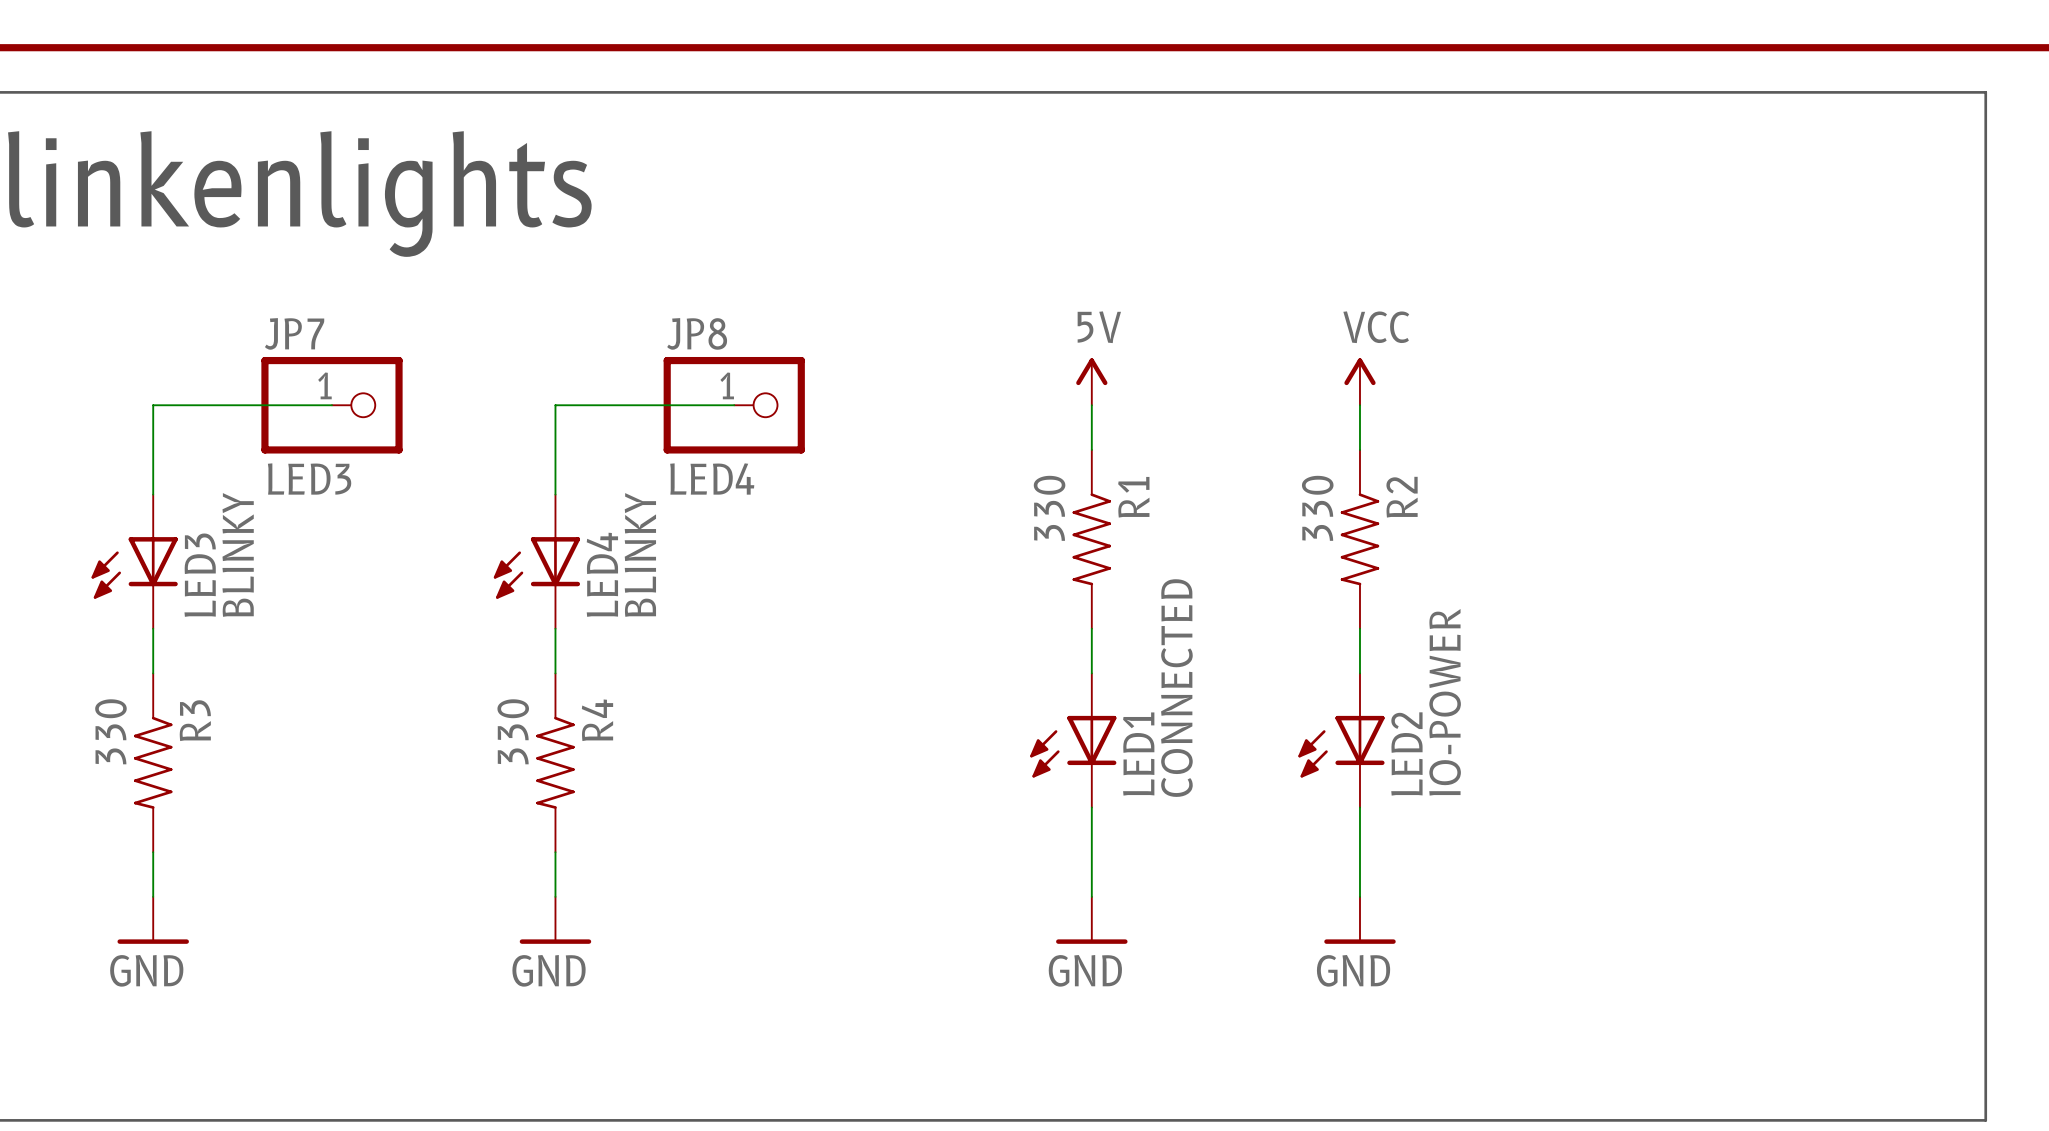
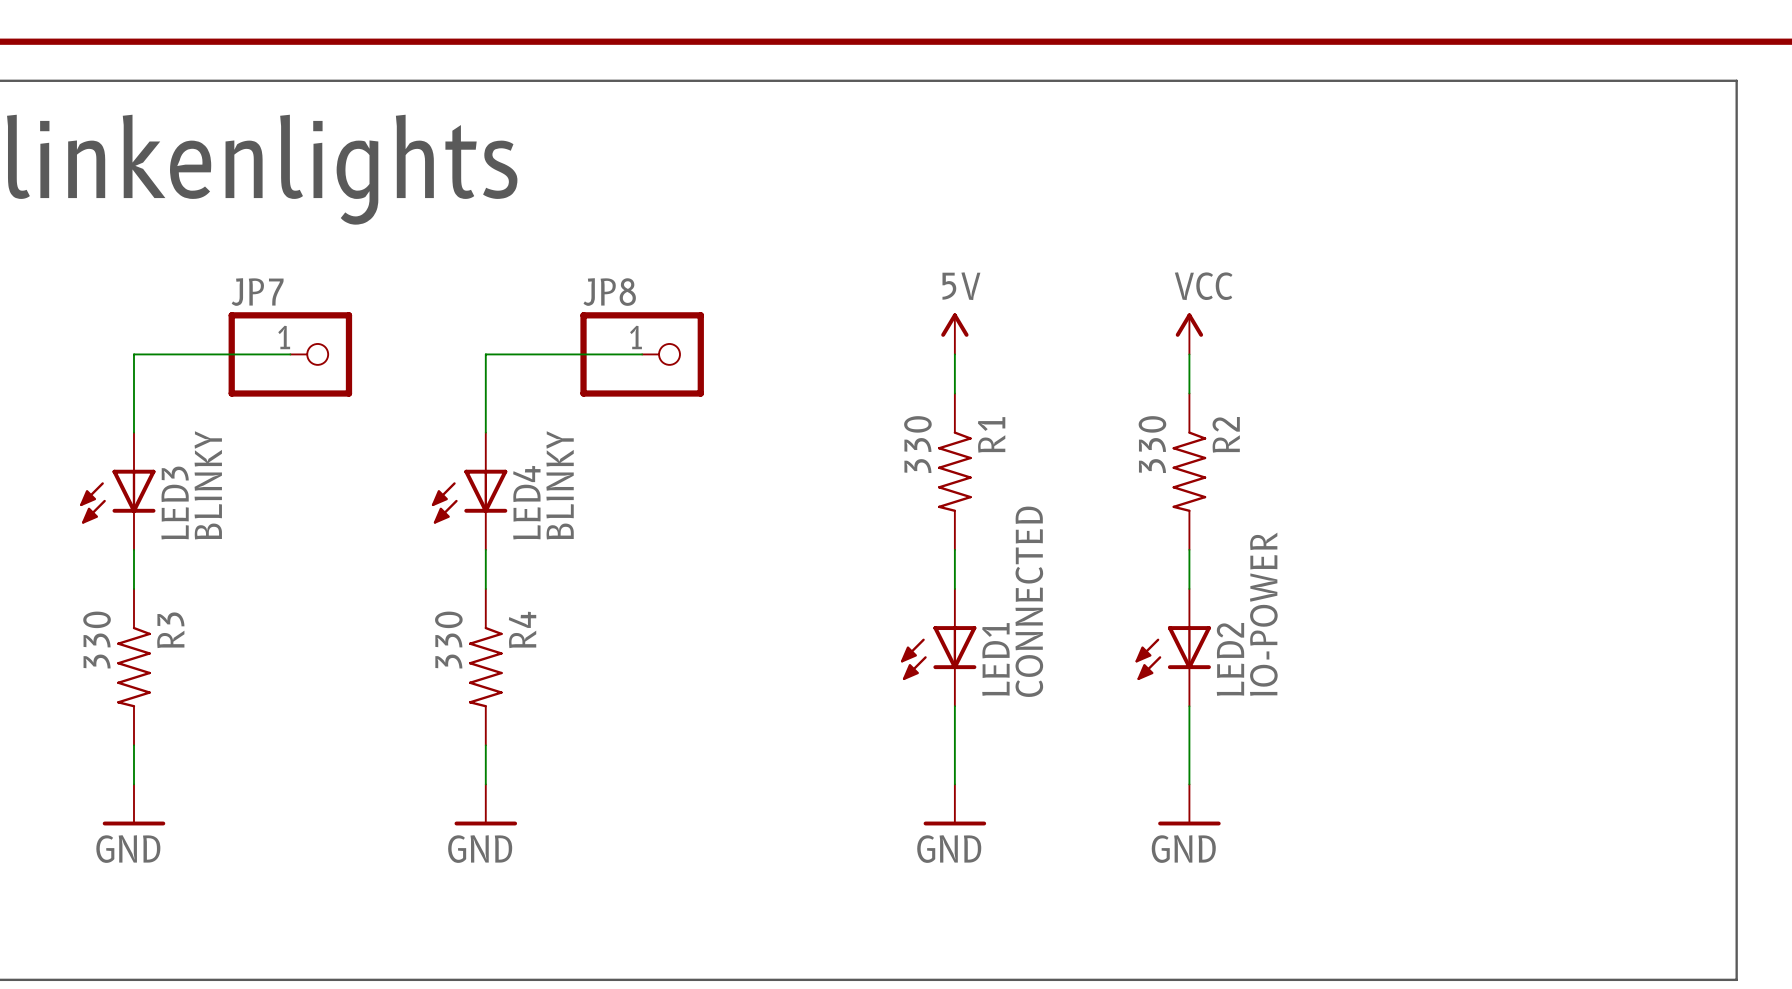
JP7 value: LED3 (309, 479) -> none
JP8 value: LED4 (712, 479) -> none

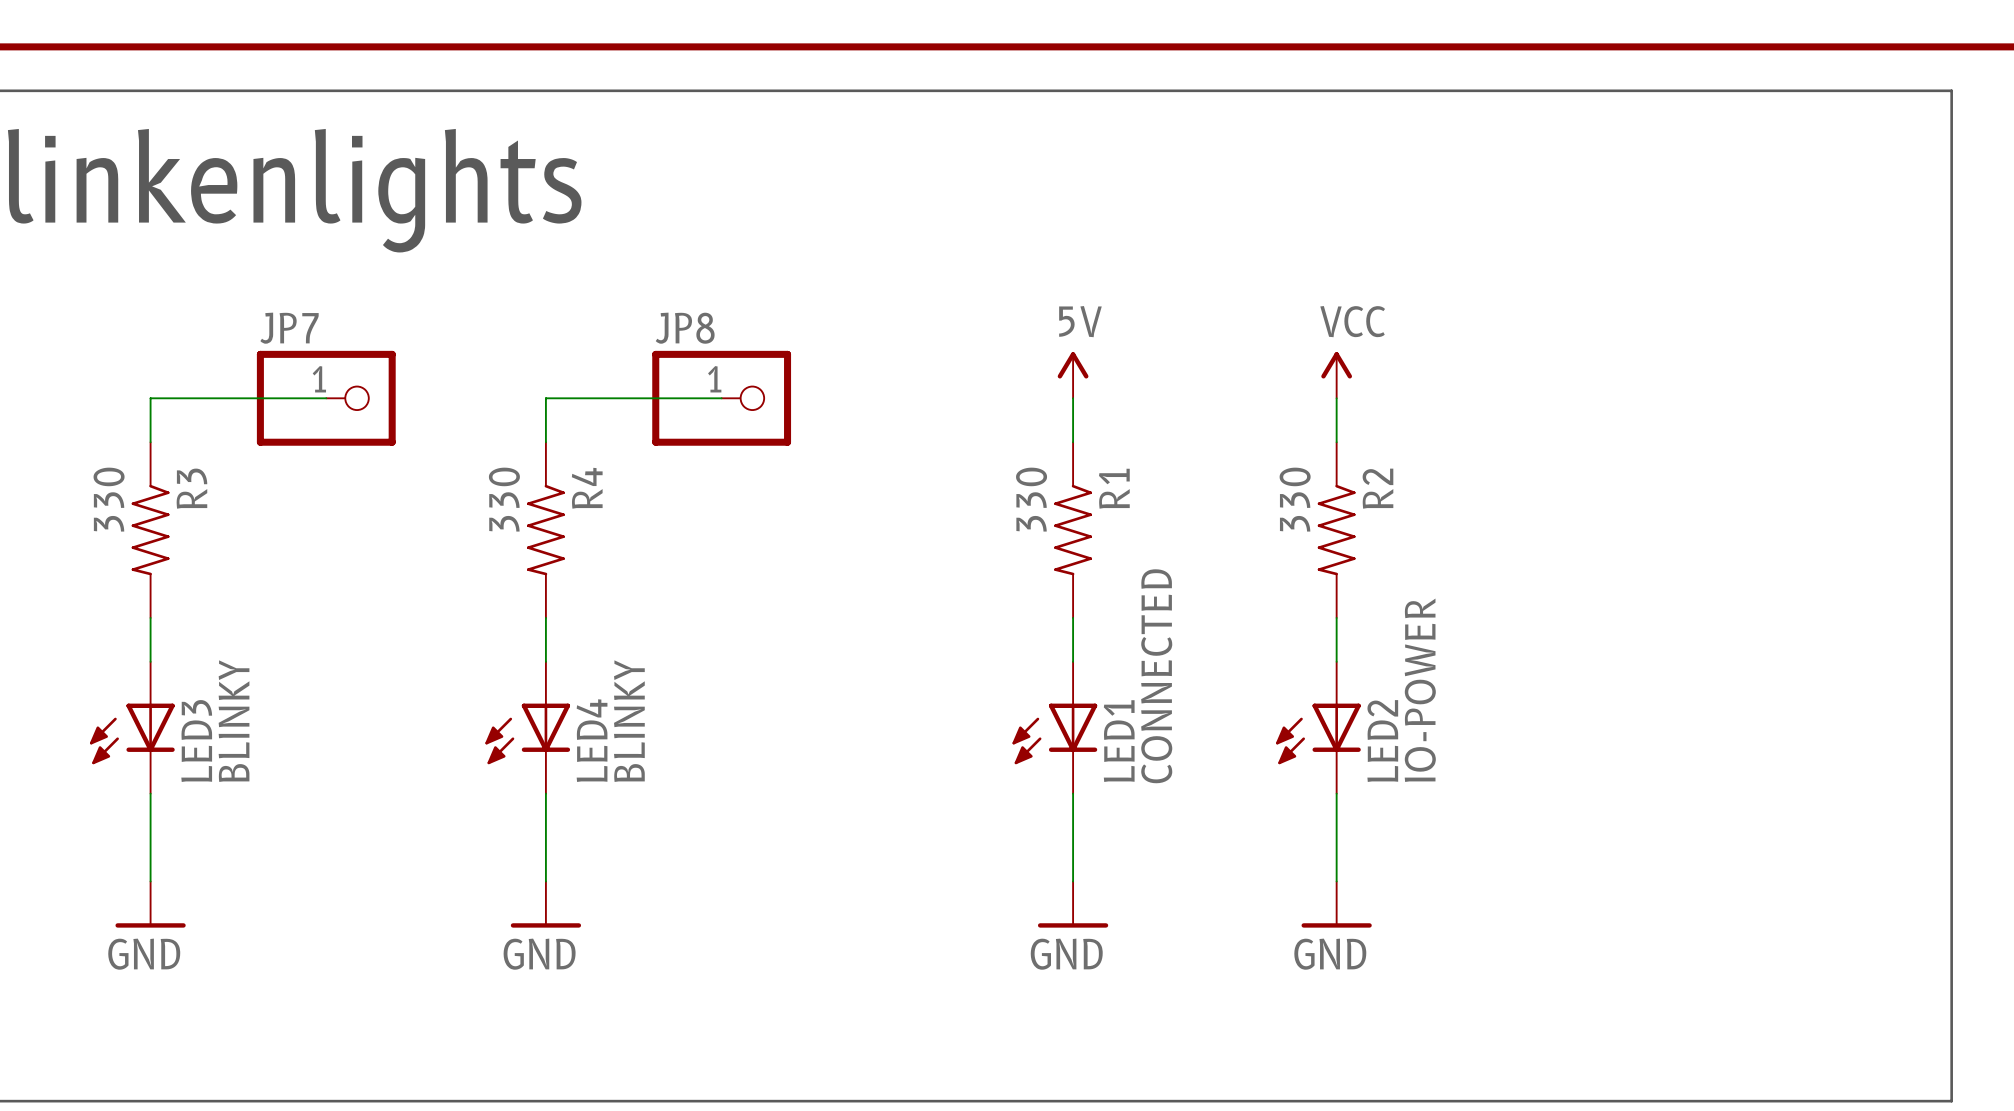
LED3 position: (117, 491) -> (132, 727)
LED4 position: (469, 491) -> (527, 727)
R3 position: (133, 667) -> (150, 530)
R4 position: (485, 667) -> (545, 530)

